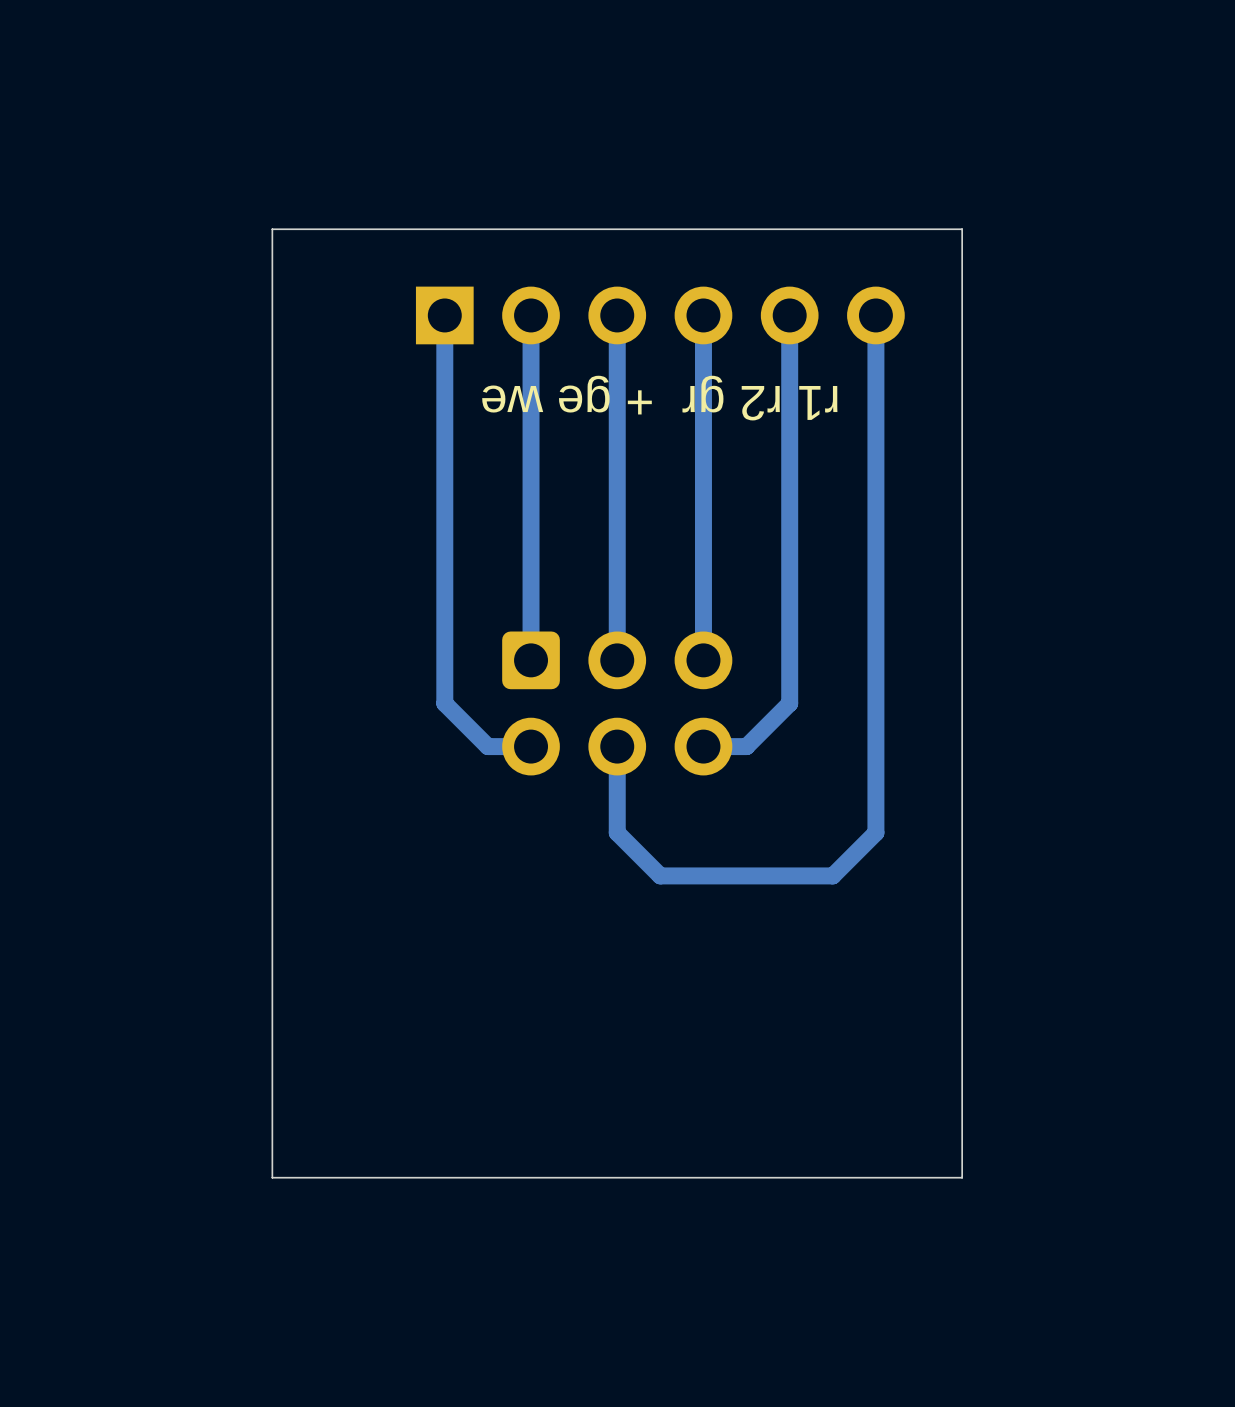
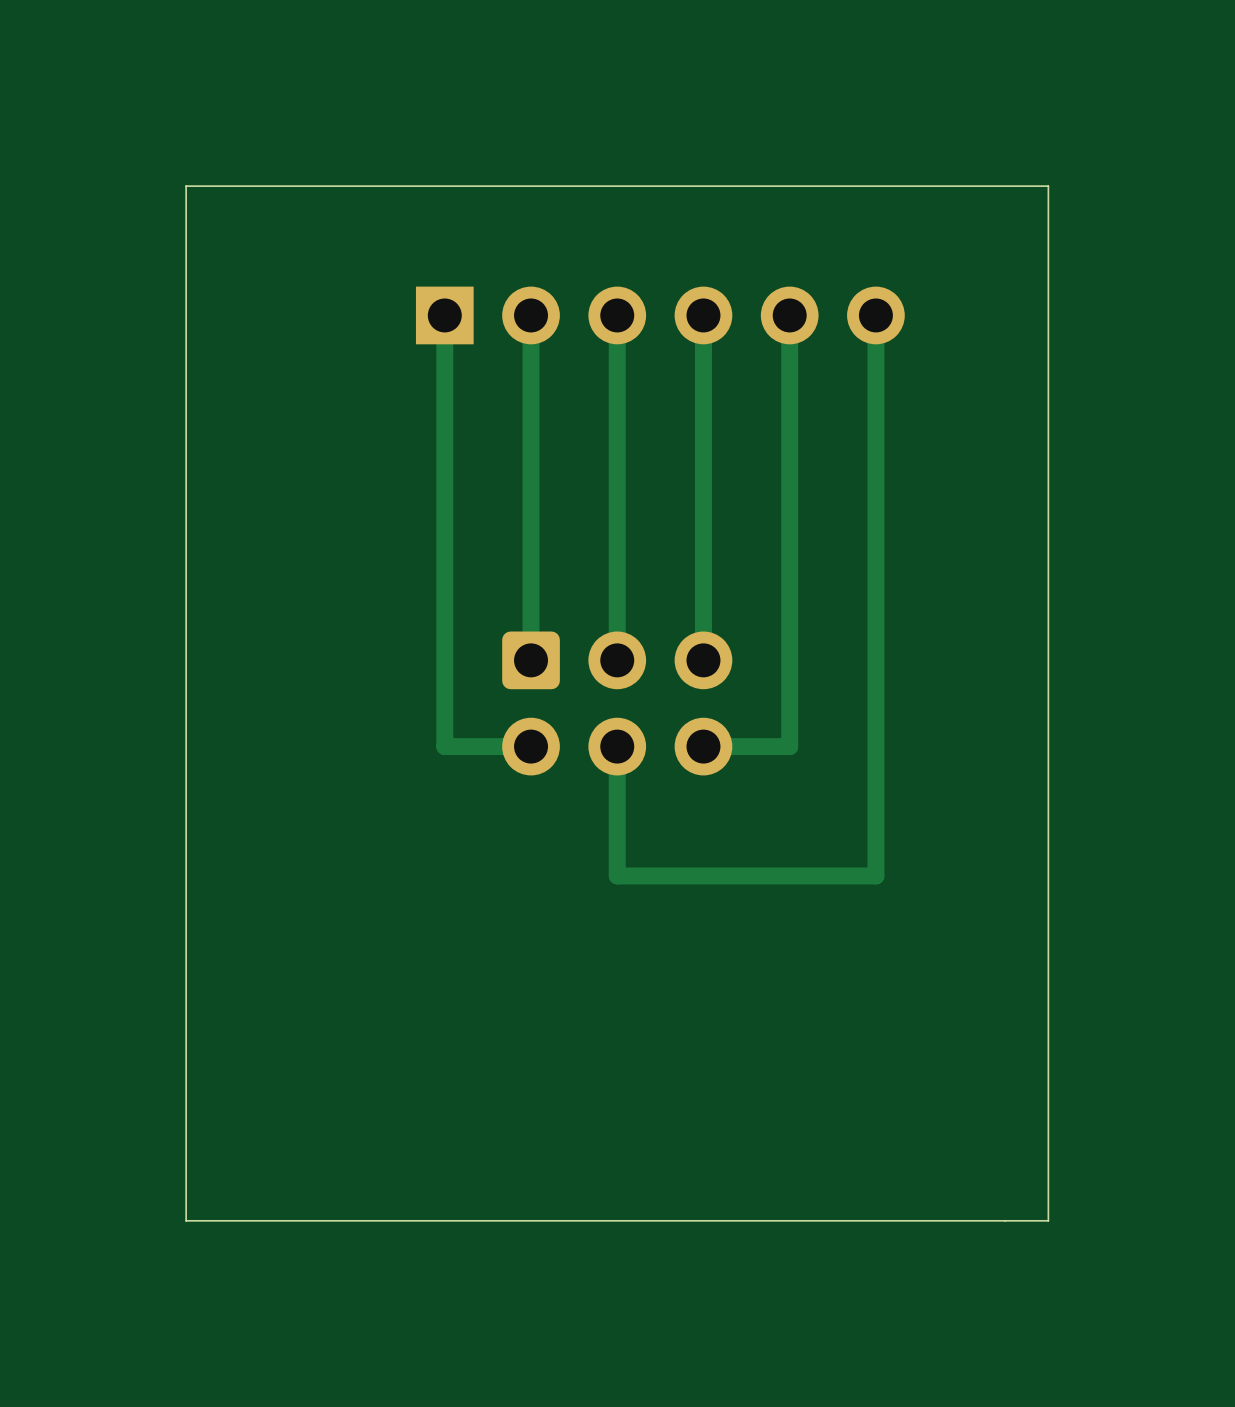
board edge: (962, 229) (962, 1177) (272, 1177) (272, 229) (962, 229) -> (1048, 186) (1048, 1220) (186, 1220) (186, 186) (1048, 186)
text: r1 r2 gr + ge we (659, 398) -> none
track: (444, 703) (487, 746) -> (444, 703) (444, 746) (487, 746)
track: (789, 703) (746, 746) -> (789, 703) (789, 746) (746, 746)
track: (617, 832) (660, 875) -> (617, 832) (617, 875) (660, 875)
track: (875, 832) (832, 875) -> (875, 832) (875, 875) (832, 875)

